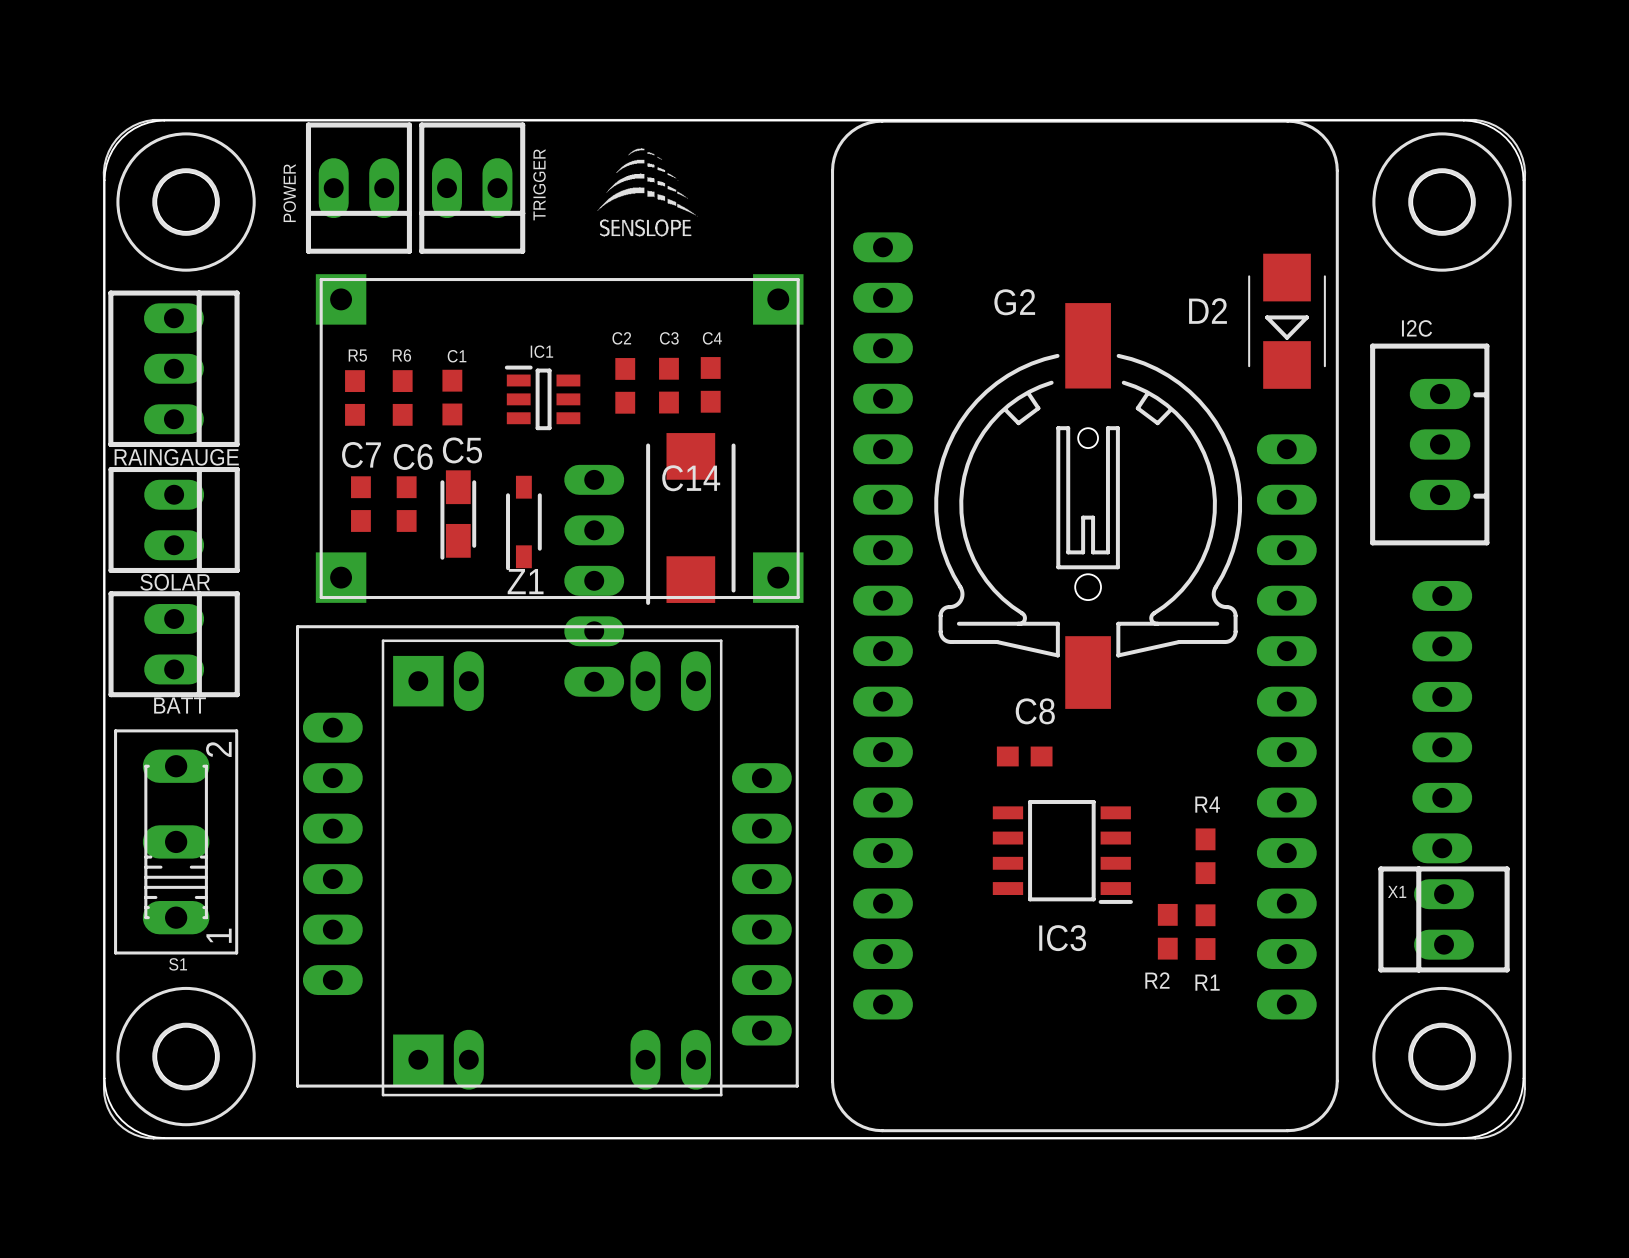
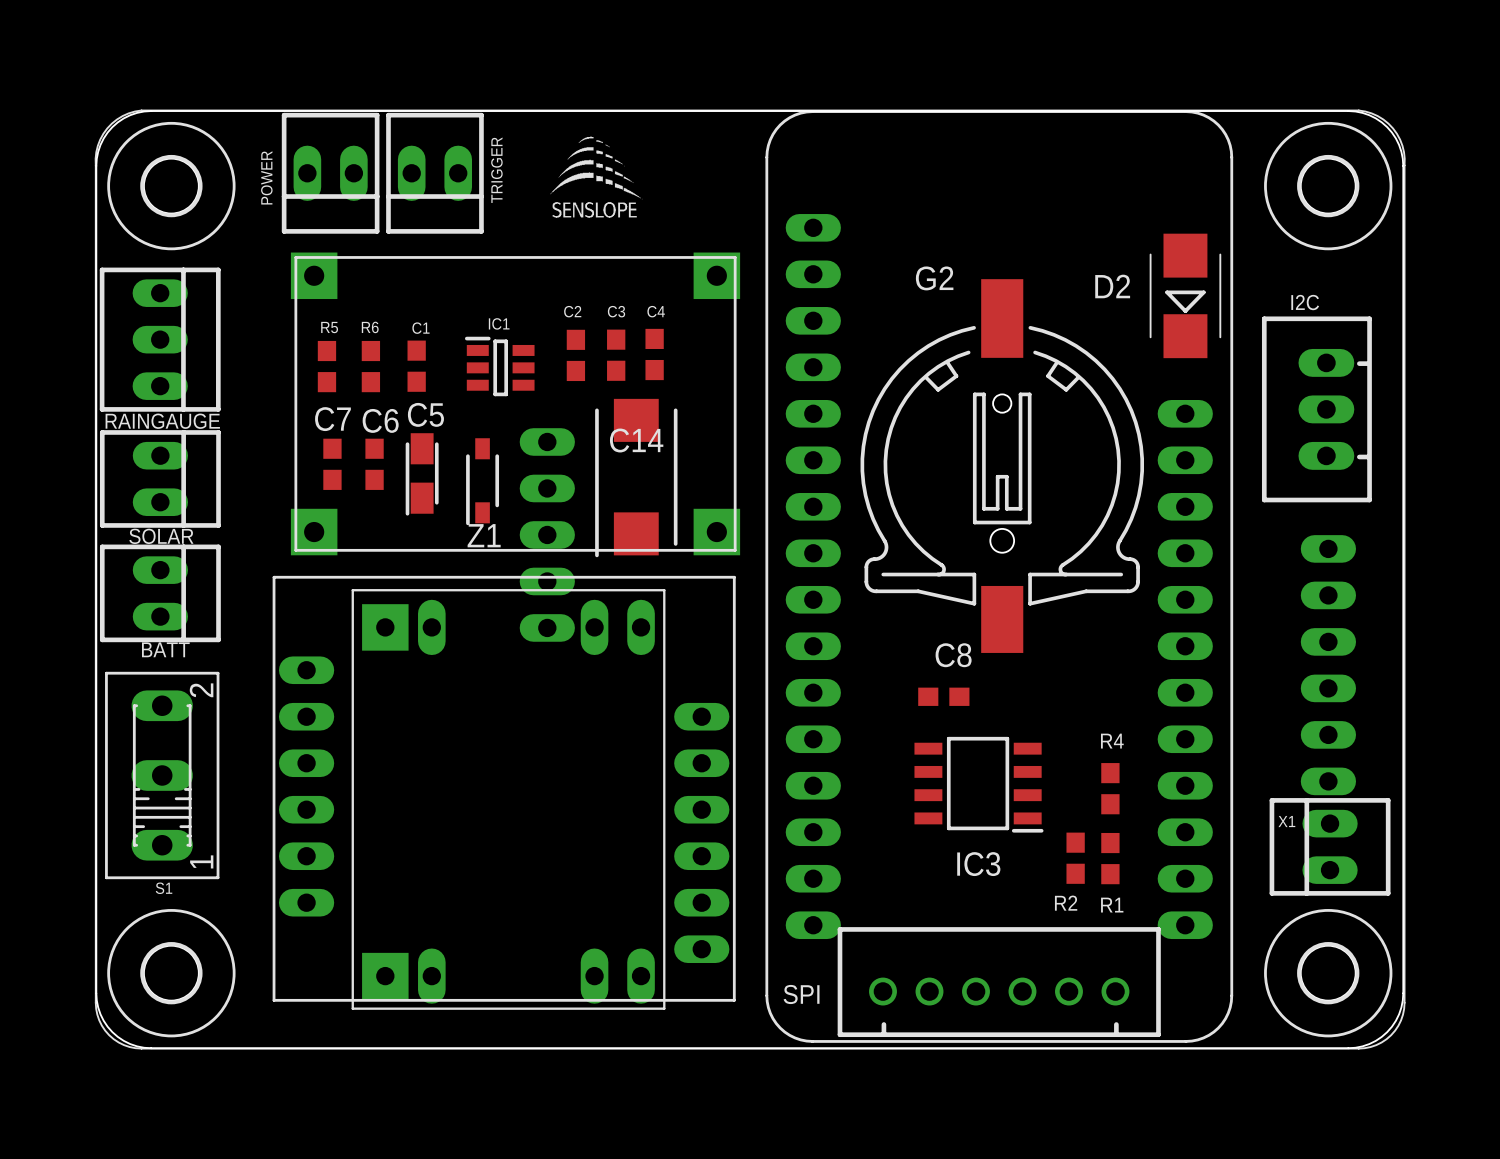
SPI: none -> (999, 982)

